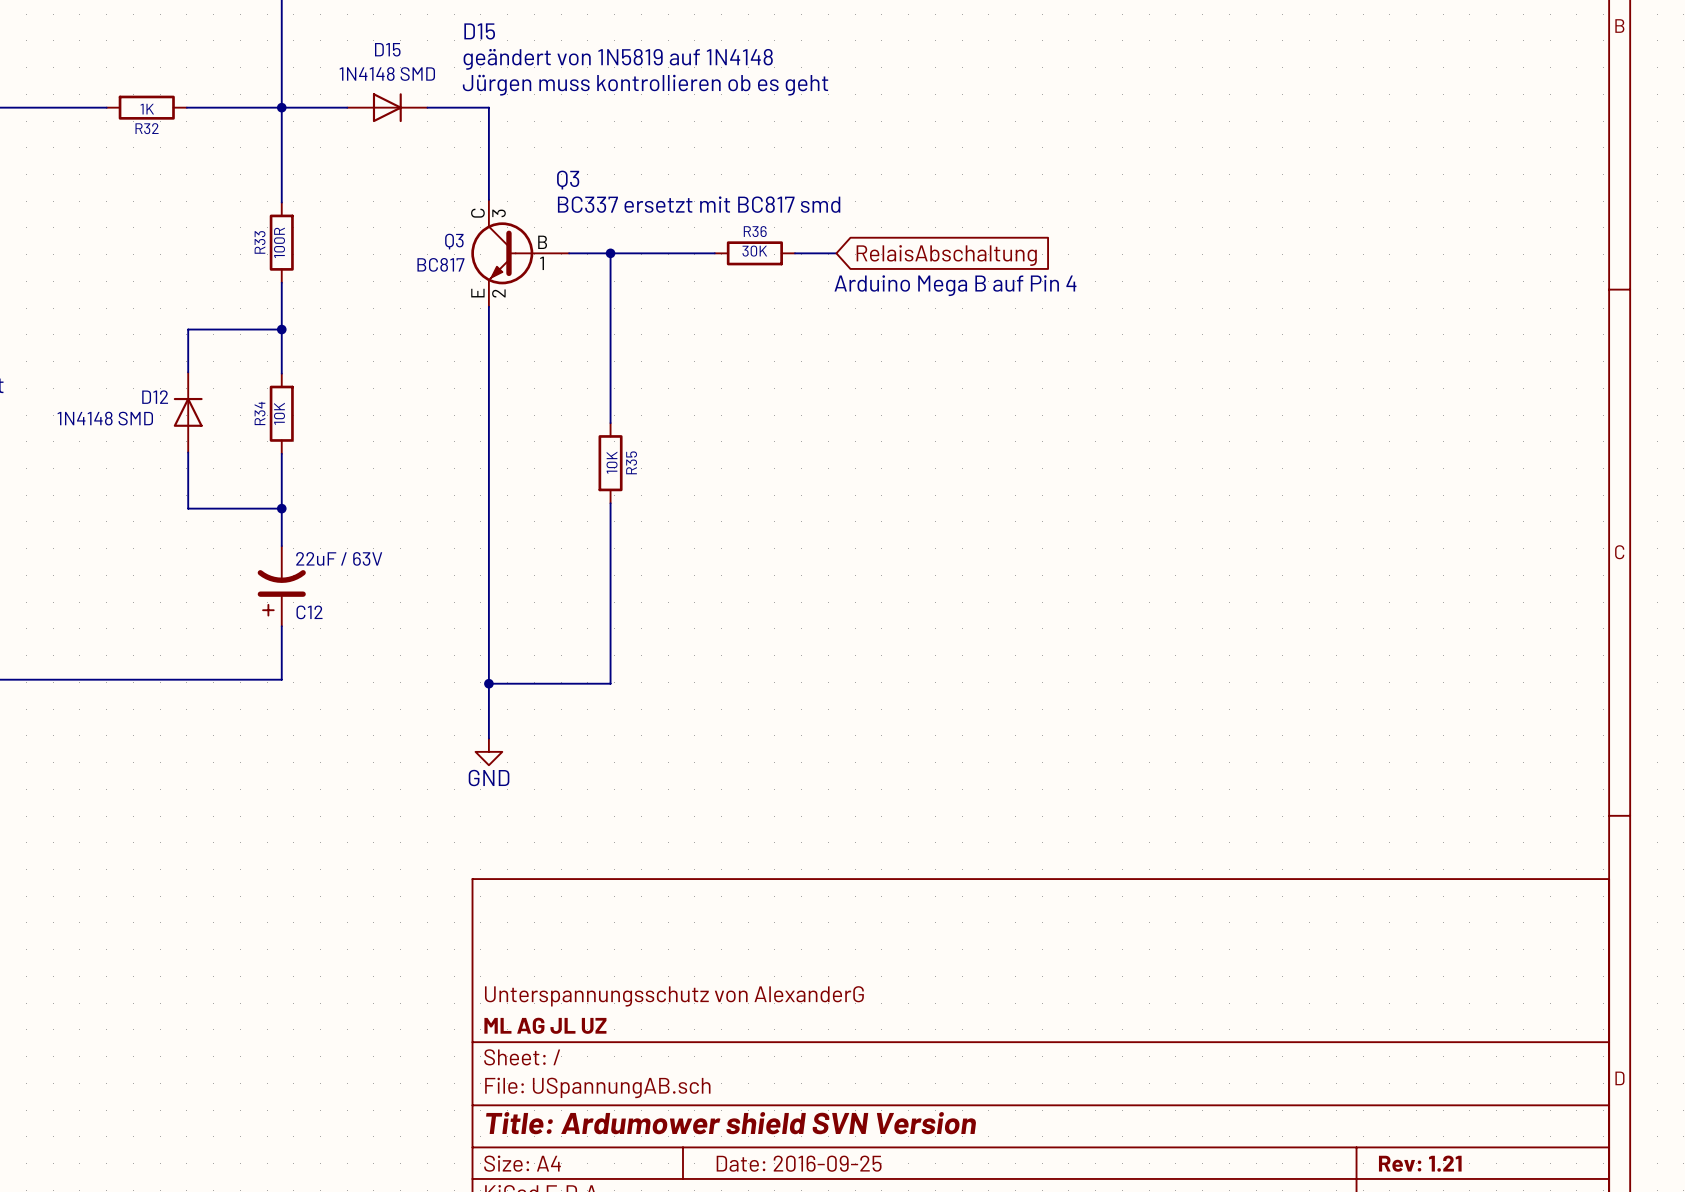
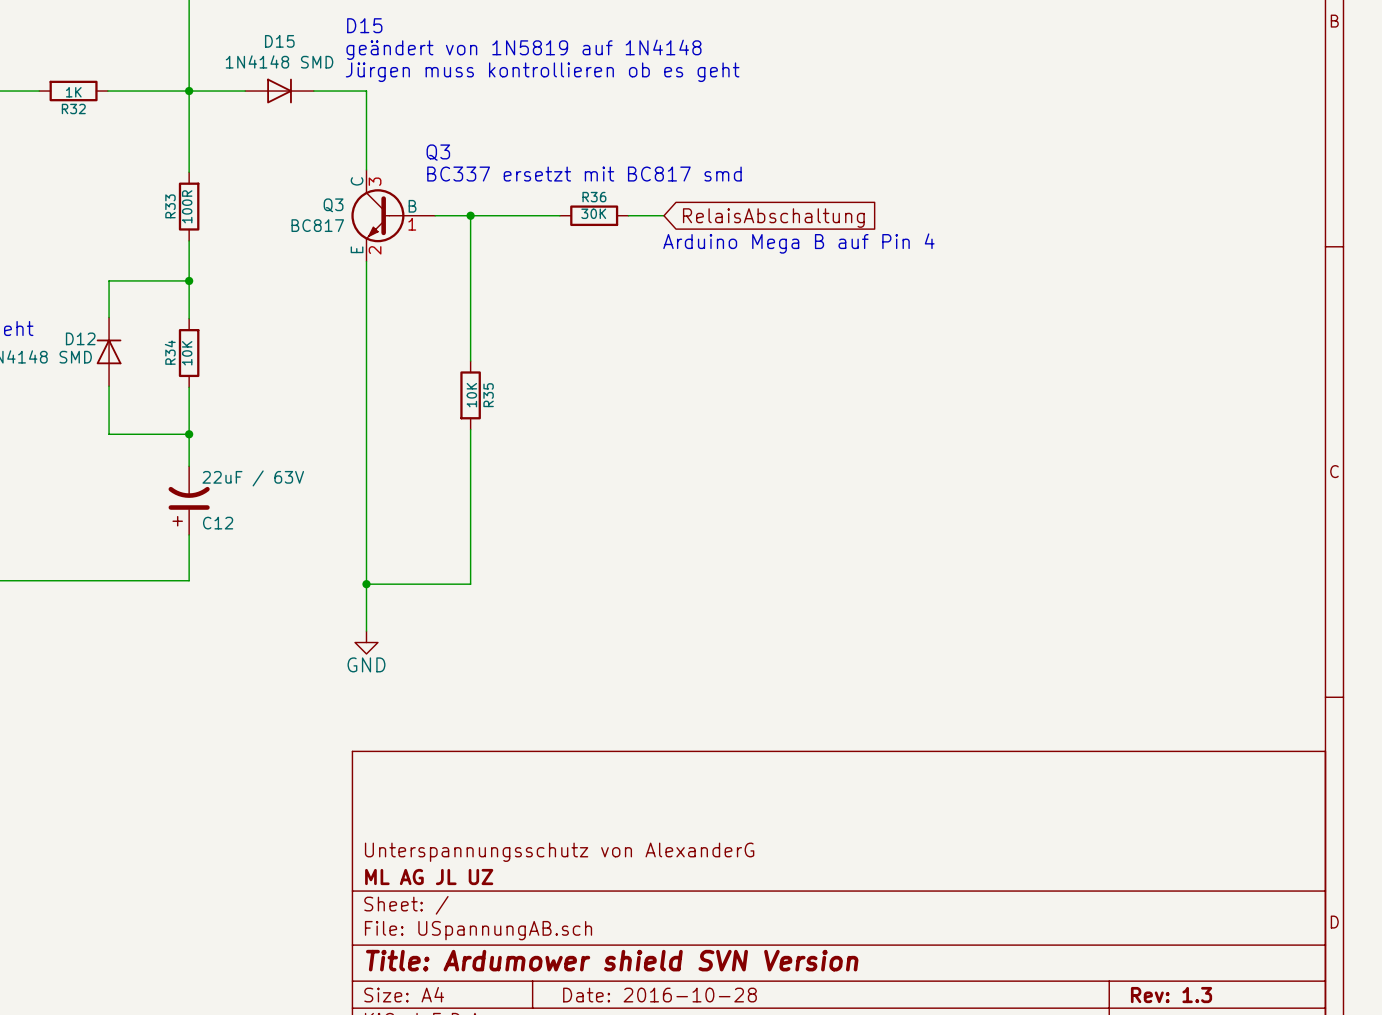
title block: Date: 2016-09-25 (799, 1163) -> Date: 2016-10-28 (659, 995)
title block: Rev: 1.21 (1420, 1163) -> Rev: 1.3 (1171, 995)

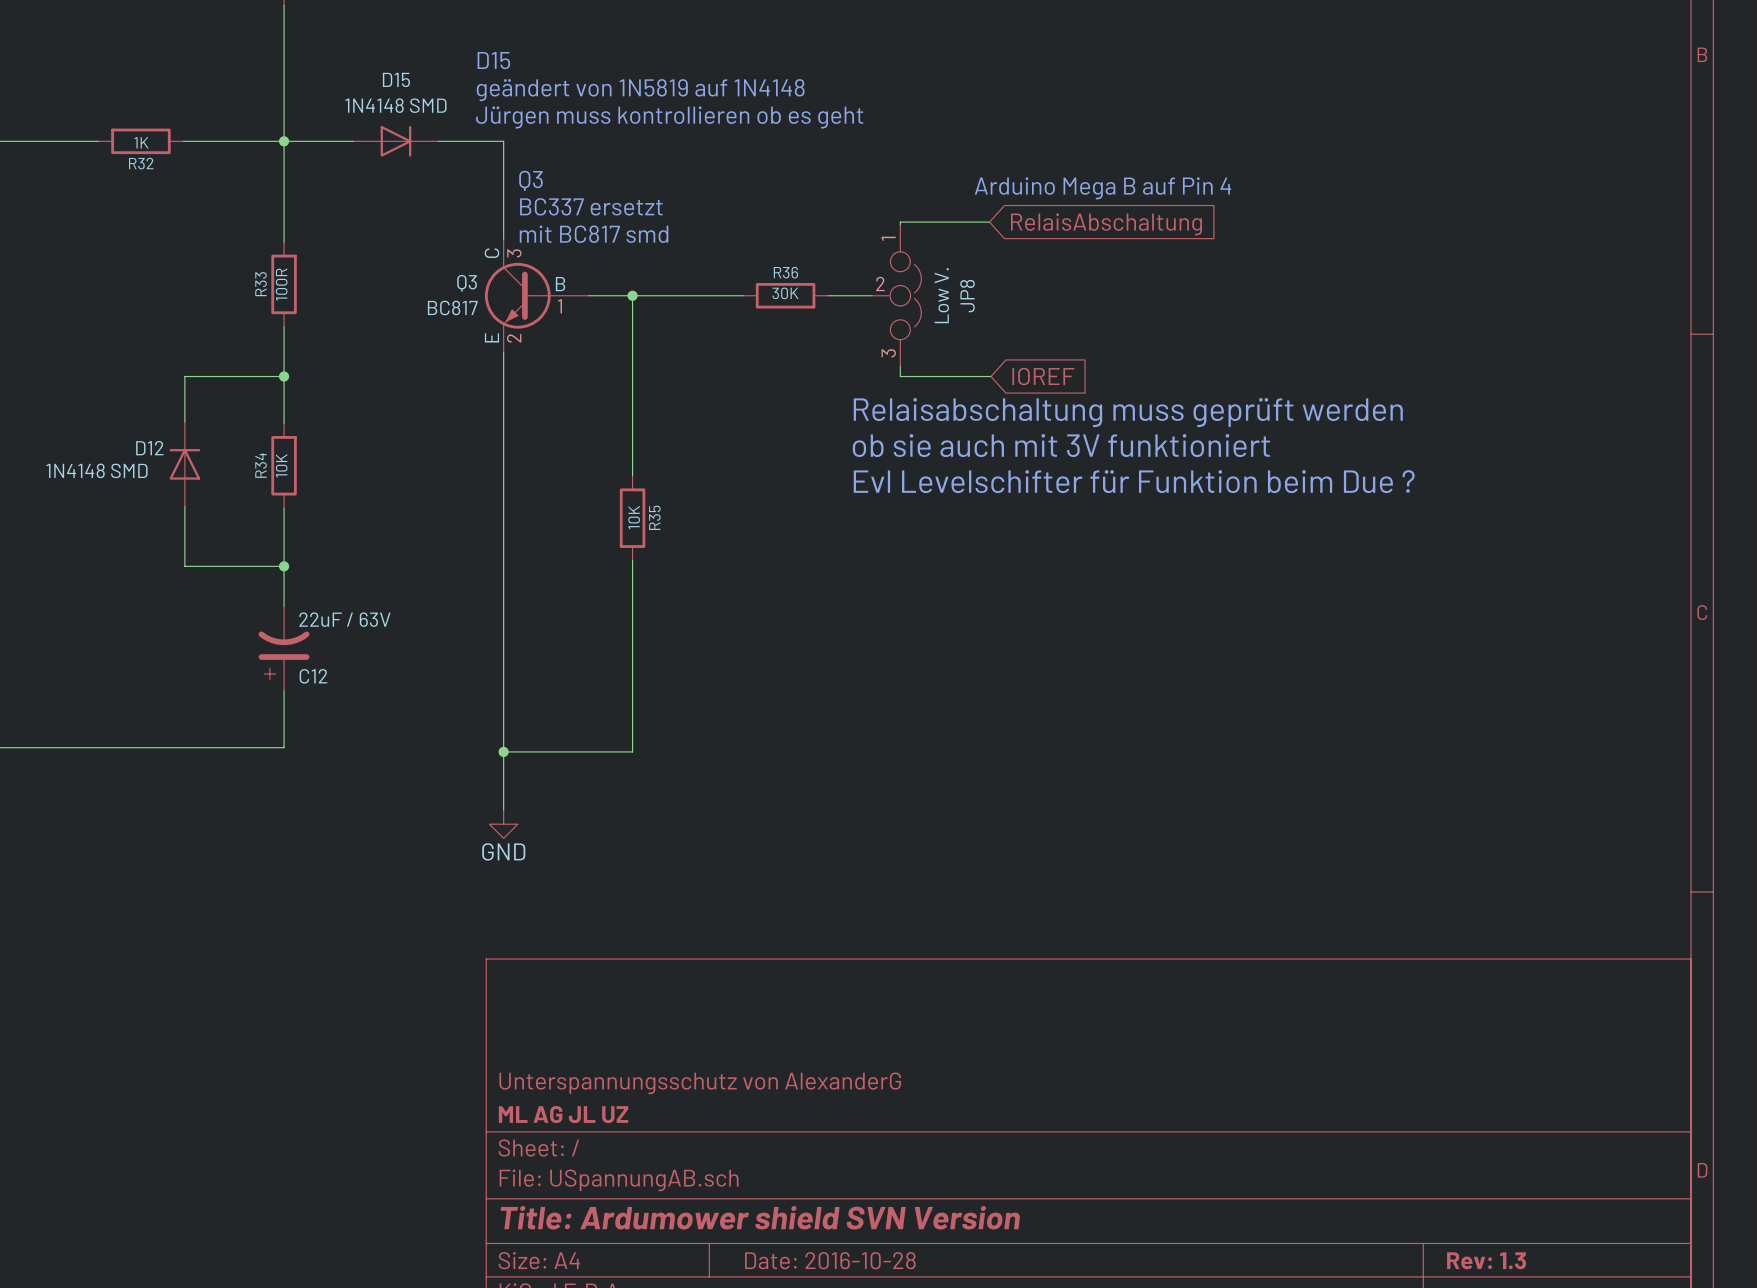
text: none -> BC337 ersetzt (591, 206)
text position: Q3 (438, 152) -> Q3 (530, 180)
wire: none -> (989, 222) (900, 222) (900, 224)
text: BC337 ersetzt mit BC817 smd (584, 174) -> mit BC817 smd (594, 234)
JP8: none -> Low V. (896, 295)
global label position: RelaisAbschaltung (773, 218) -> RelaisAbschaltung (1106, 224)
text position: Arduino Mega B auf Pin 4 (798, 243) -> Arduino Mega B auf Pin 4 (1103, 188)
wire: none -> (900, 366) (900, 376) (991, 376)
global label: none -> IOREF (1043, 376)
text: none -> Relaisabschaltung muss geprüft werden (1128, 412)
text: none -> ob sie auch mit 3V funktioniert (1061, 445)
text: none -> Evl Levelschifter für Funktion beim Due ? (1134, 481)

